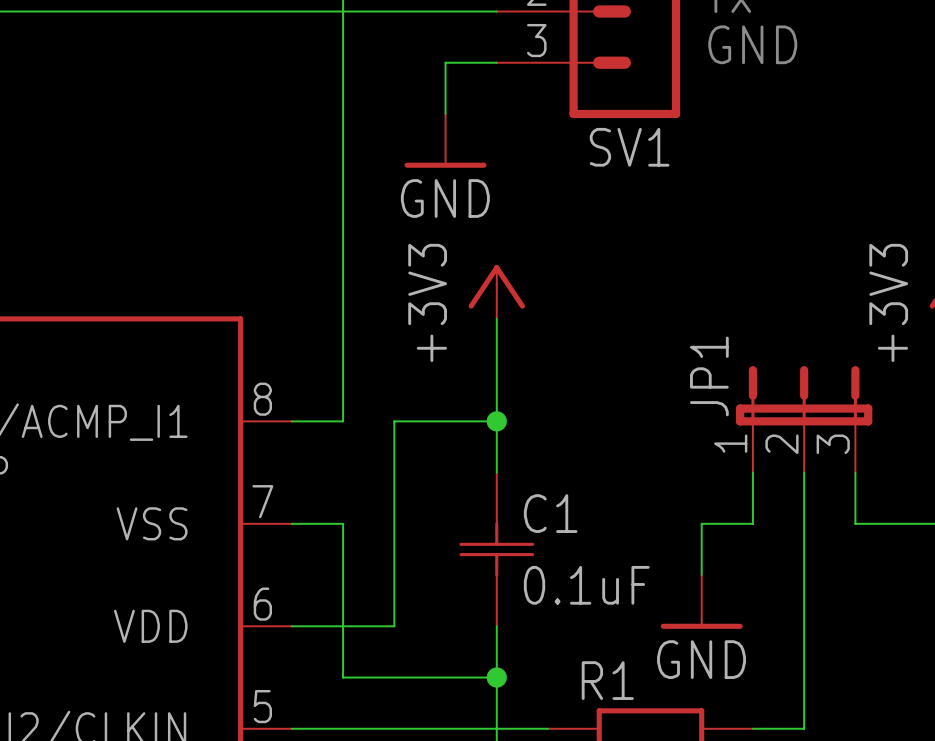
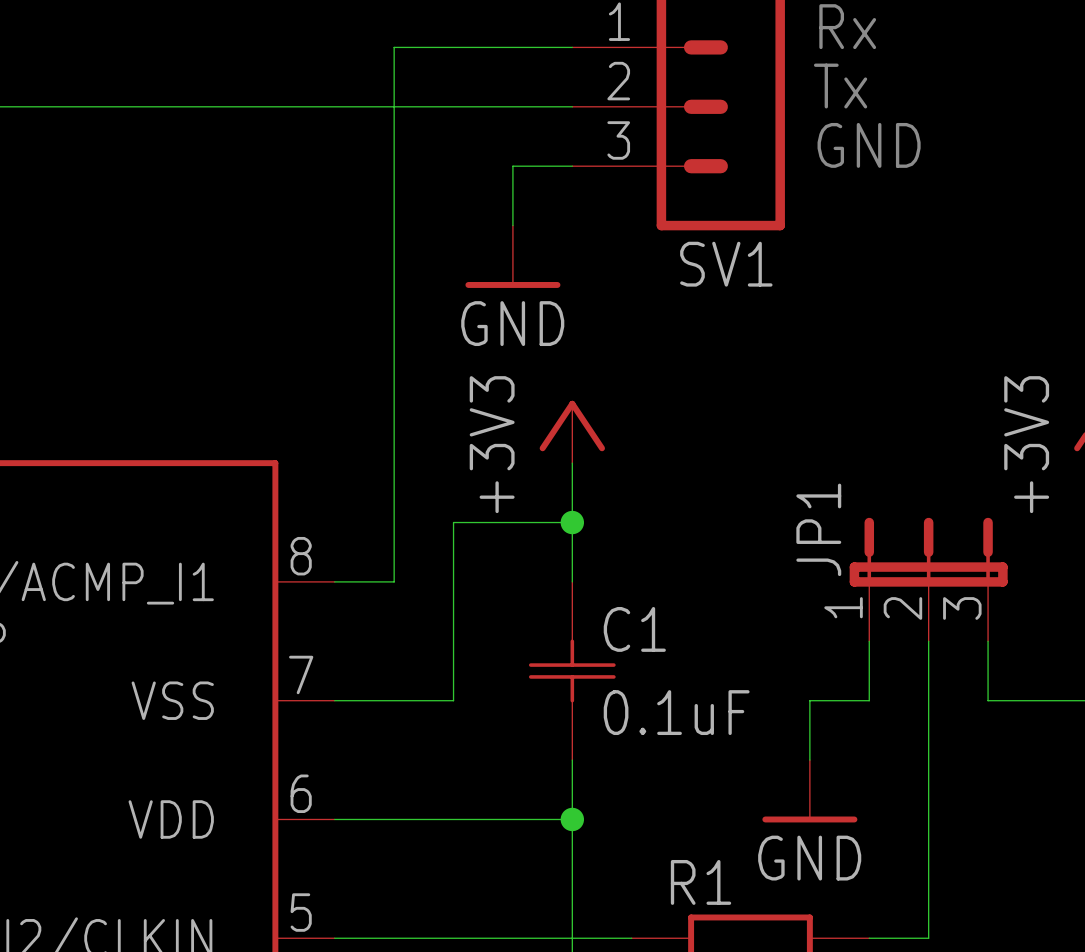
wire: (394, 421) (496, 421) (496, 472) -> (453, 581) (453, 522) (572, 522)
junction position: (496, 421) -> (572, 522)
wire: (343, 523) (343, 677) (496, 677) -> (394, 700) (453, 700)
wire: (394, 523) (394, 626) -> (572, 760) (572, 819) (453, 819)
C1 position: (496, 549) -> (572, 671)
junction position: (496, 677) -> (572, 819)

